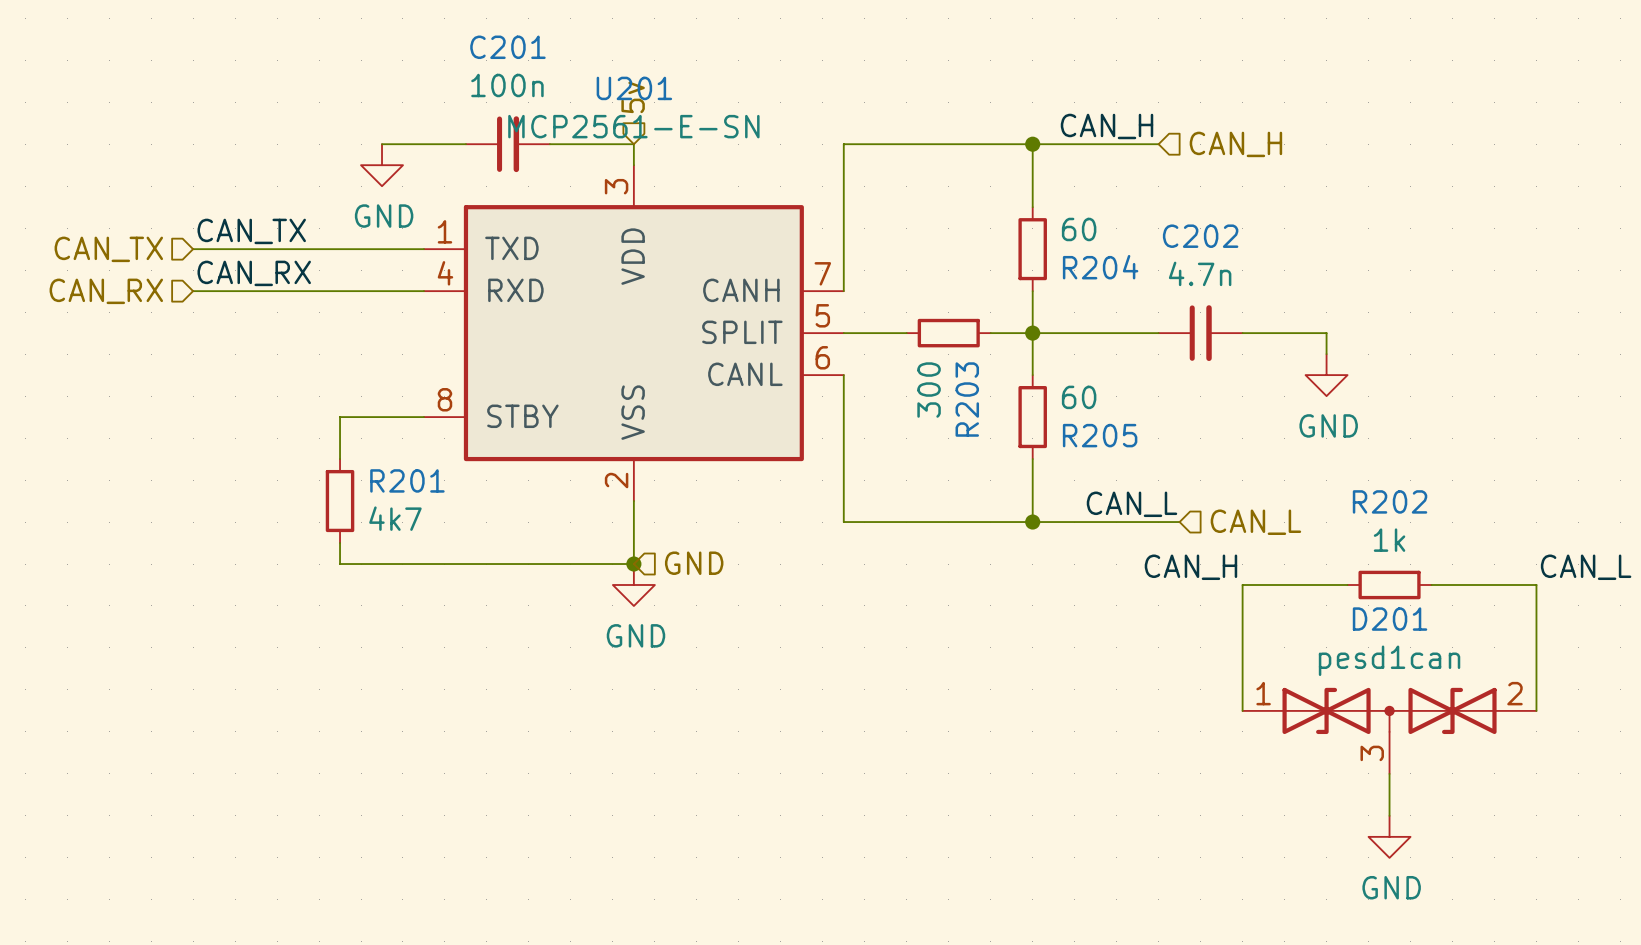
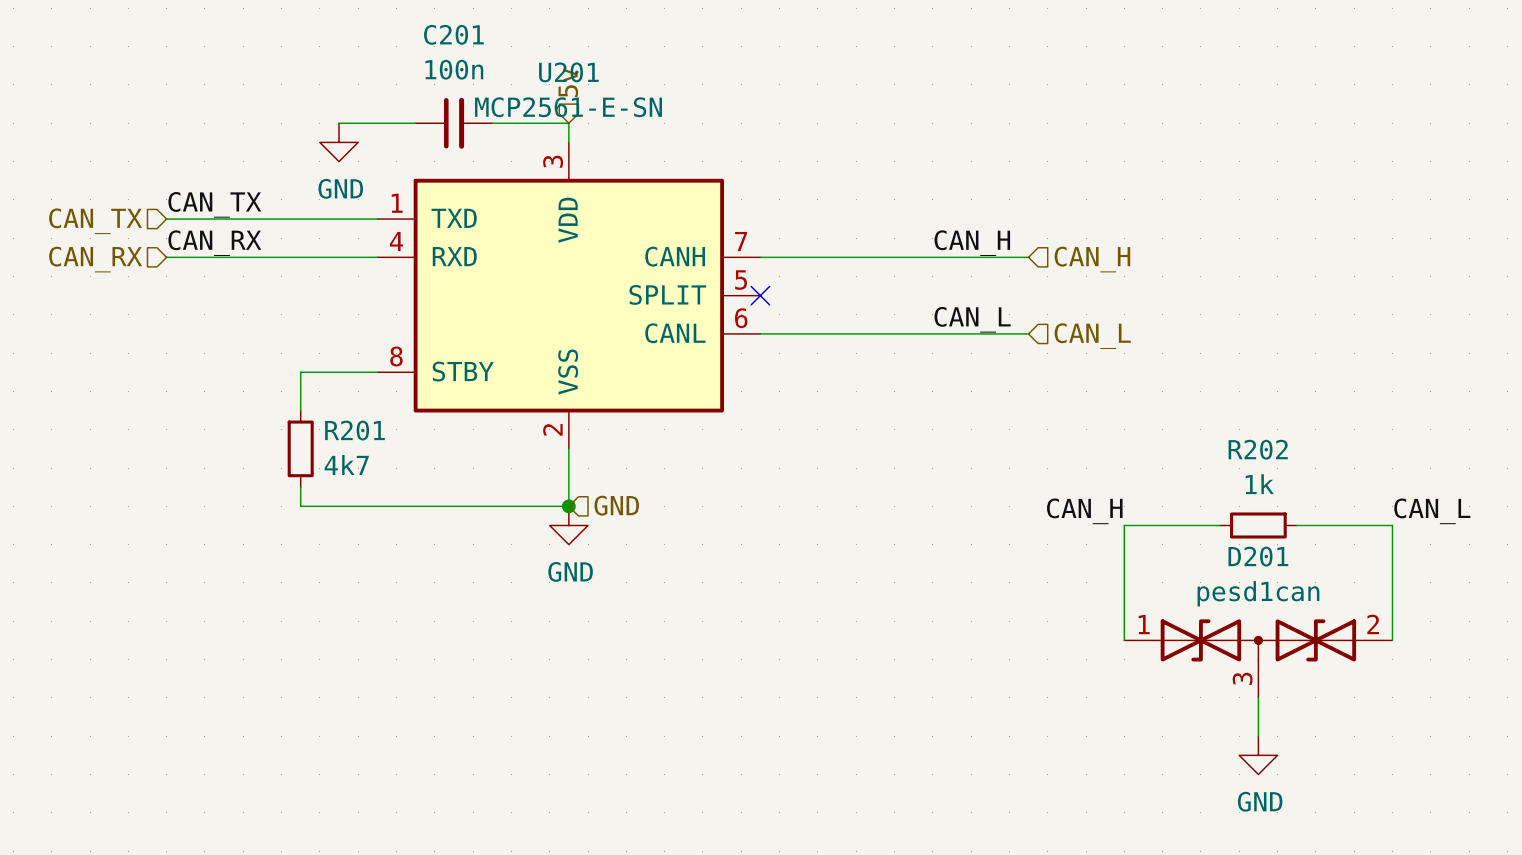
label position: CAN_H (1107, 126) -> CAN_H (972, 243)
wire: (1032, 144) (1032, 207) -> none
junction: (1032, 144) -> none
wire: (1158, 144) (843, 144) (843, 291) -> (1028, 257) (760, 257)
hierarchical label position: CAN_H (1235, 144) -> CAN_H (1092, 259)
R204: 60 (1032, 249) -> none
wire: (1032, 291) (1032, 375) -> none
wire: (843, 333) (906, 333) -> none
no-connect mark: none -> (760, 295)
R203: 300 (948, 333) -> none
wire: (990, 333) (1158, 333) -> none
junction: (1032, 333) -> none
C202: 4.7n (1200, 333) -> none
wire: (1242, 333) (1326, 333) (1326, 354) -> none
wire: (843, 375) (843, 522) (1179, 522) -> (760, 333) (1028, 333)
power symbol: GND (1326, 375) -> none
R205: 60 (1032, 417) -> none
wire: (1032, 459) (1032, 522) -> none
label position: CAN_L (1132, 504) -> CAN_L (972, 319)
junction: (1032, 522) -> none
hierarchical label position: CAN_L (1255, 522) -> CAN_L (1092, 336)

